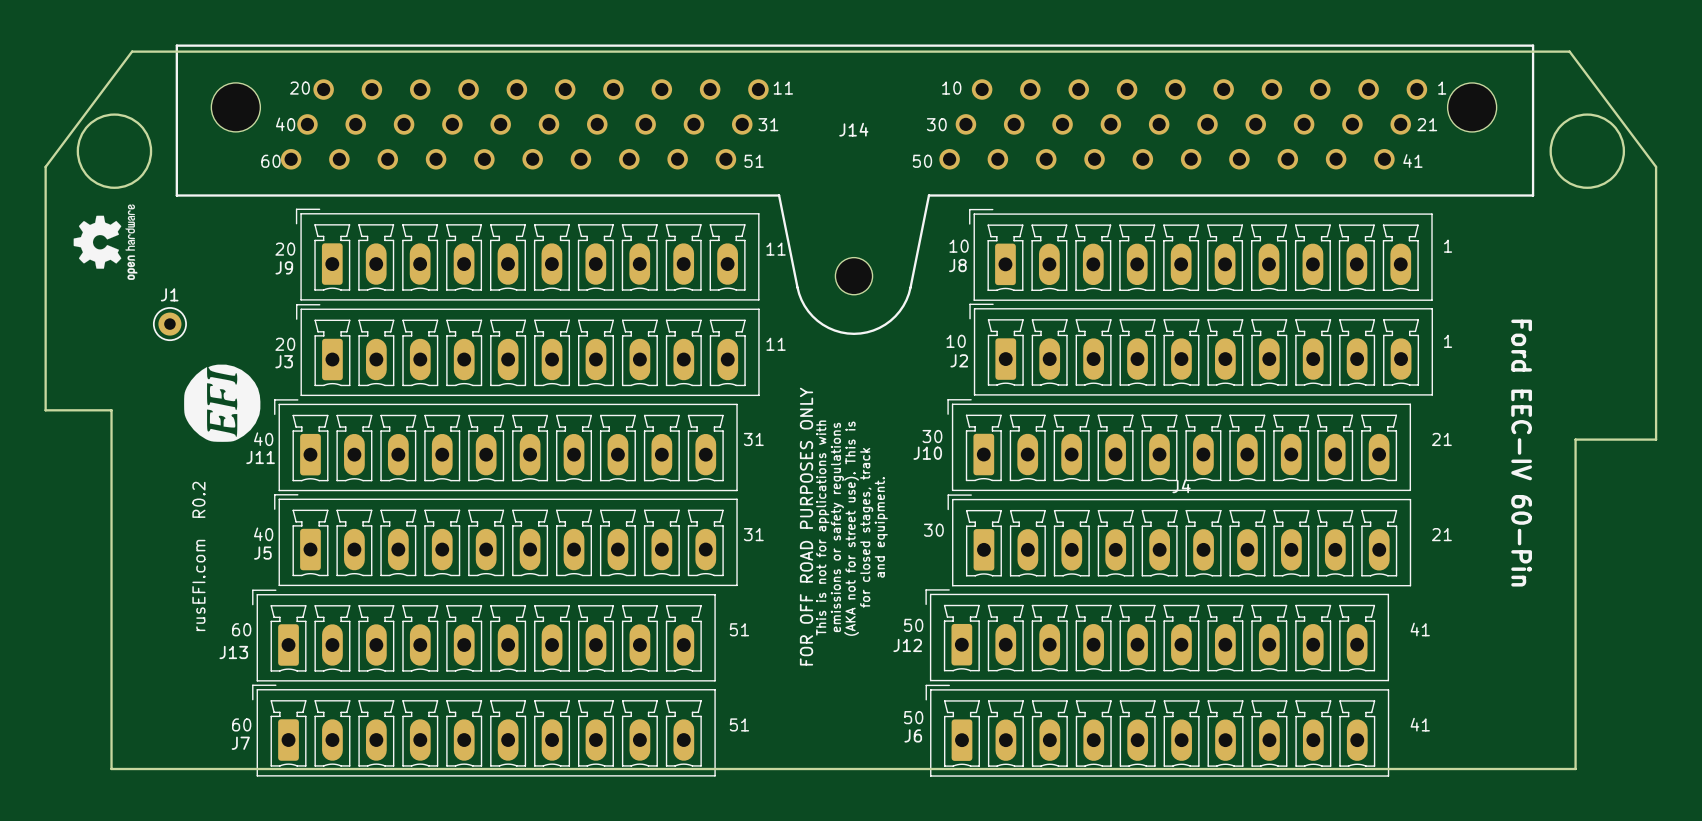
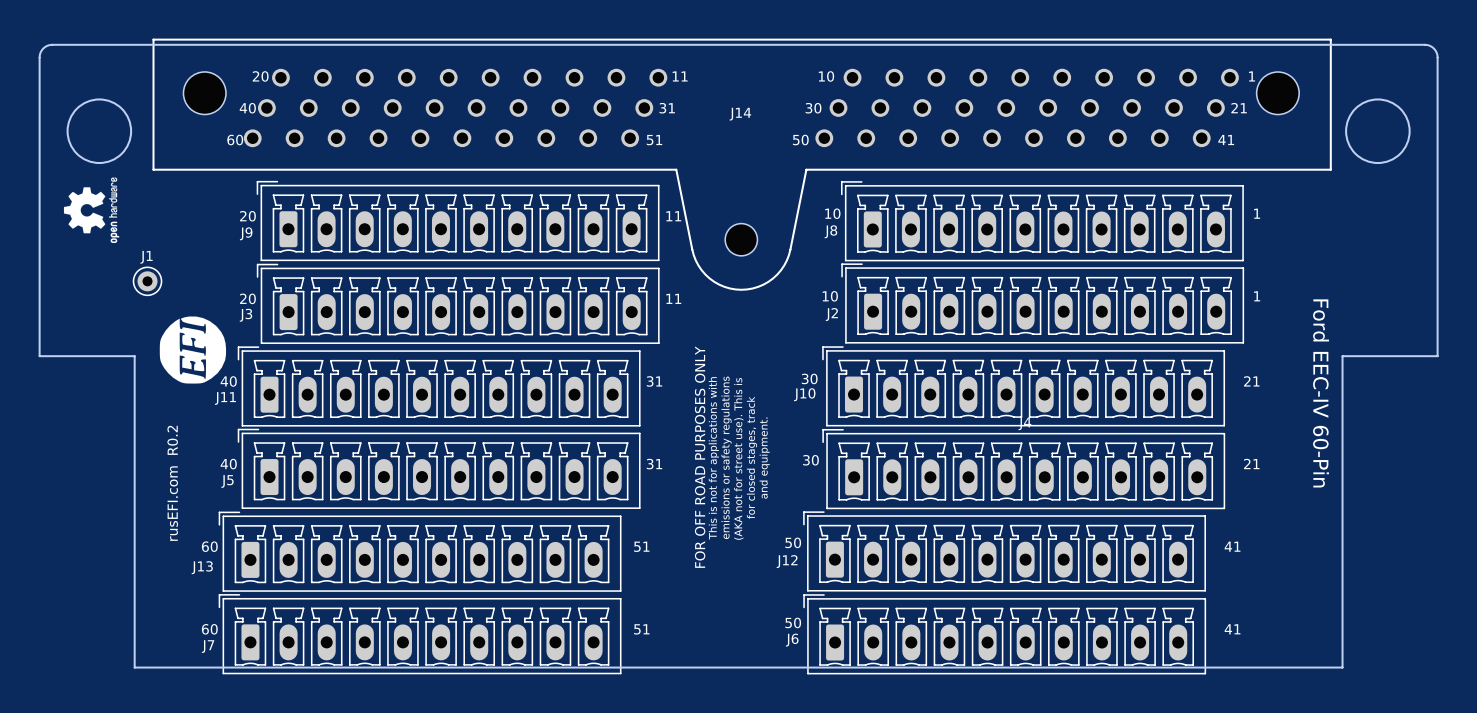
board edge: (132, 51) (45, 166) -> (114, 44) (50, 44) (42, 49) (39, 57) (39, 144)
board edge: (1569, 51) (1656, 166) -> (1362, 44) (1426, 44) (1434, 49) (1437, 57) (1437, 144)
board edge: (111, 410) (111, 769) (155, 769) -> (96, 356) (134, 356) (134, 667)
board edge: (1656, 410) (1656, 439) (1575, 439) (1575, 769) (1546, 769) -> (1437, 356) (1342, 356) (1342, 667)

